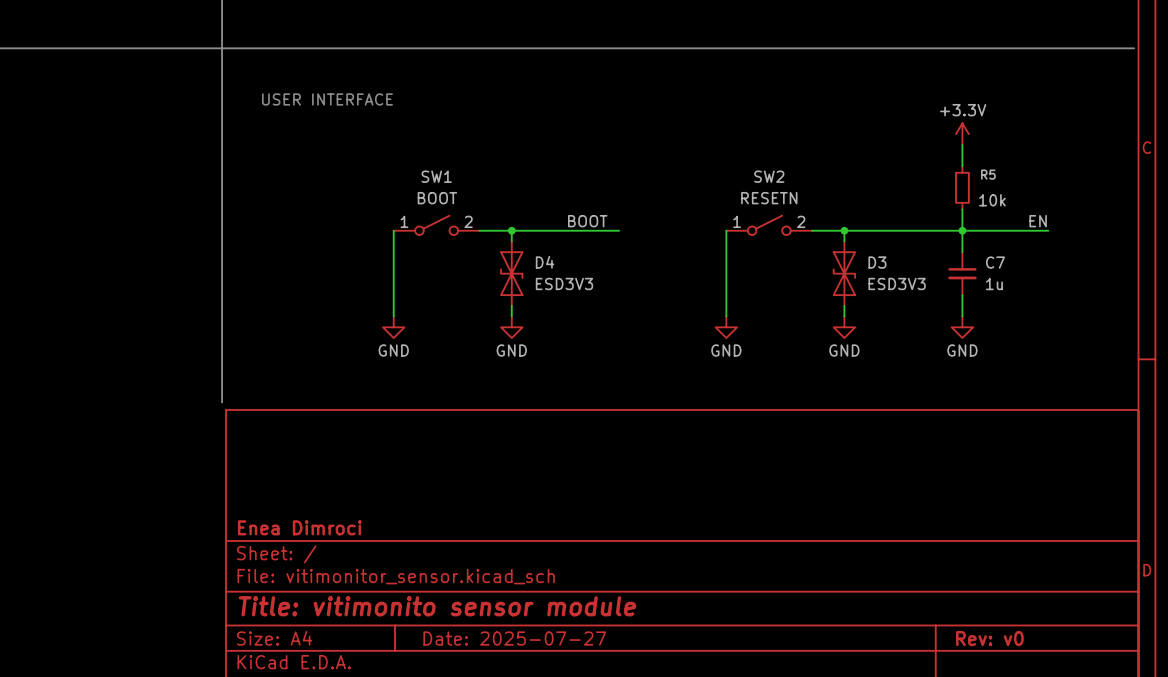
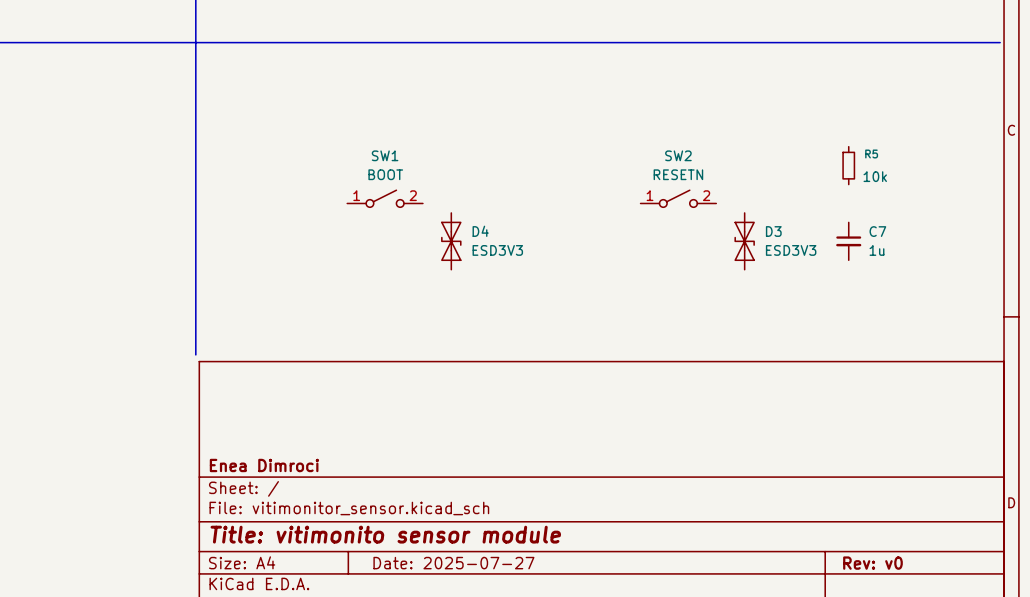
text: USER INTERFACE (327, 99) -> none
power symbol: +3.3V (962, 134) -> none
wire: (962, 144) (962, 166) -> none
wire: (962, 209) (962, 252) -> none
label: BOOT (587, 221) -> none
label: EN (1038, 221) -> none
wire: (393, 230) (393, 316) -> none
wire: (479, 230) (619, 230) -> none
wire: (511, 230) (511, 241) -> none
junction: (511, 230) -> none
wire: (726, 230) (726, 316) -> none
wire: (812, 230) (1048, 230) -> none
wire: (844, 230) (844, 241) -> none
junction: (844, 230) -> none
junction: (962, 230) -> none
wire: (962, 295) (962, 316) -> none
wire: (511, 305) (511, 316) -> none
wire: (844, 305) (844, 316) -> none
power symbol: GND (393, 327) -> none
power symbol: GND (511, 327) -> none
power symbol: GND (726, 327) -> none
power symbol: GND (844, 327) -> none
power symbol: GND (962, 327) -> none

